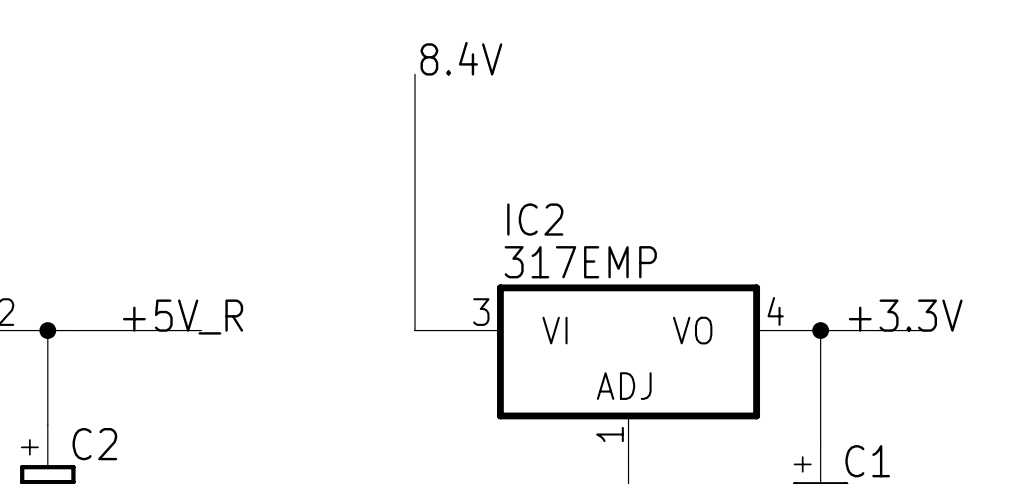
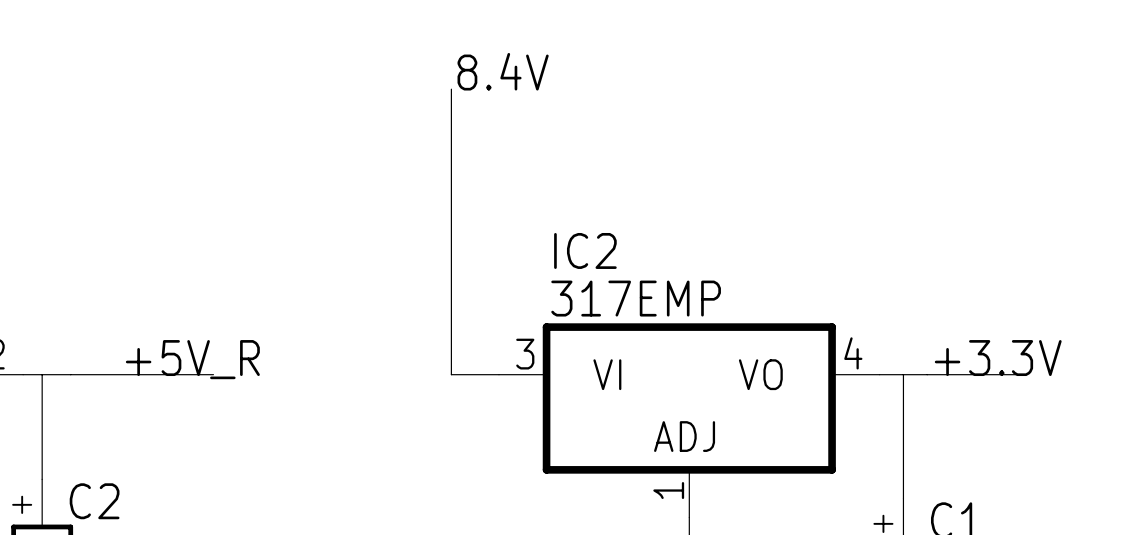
junction: (47, 330) -> none
junction: (820, 330) -> none

